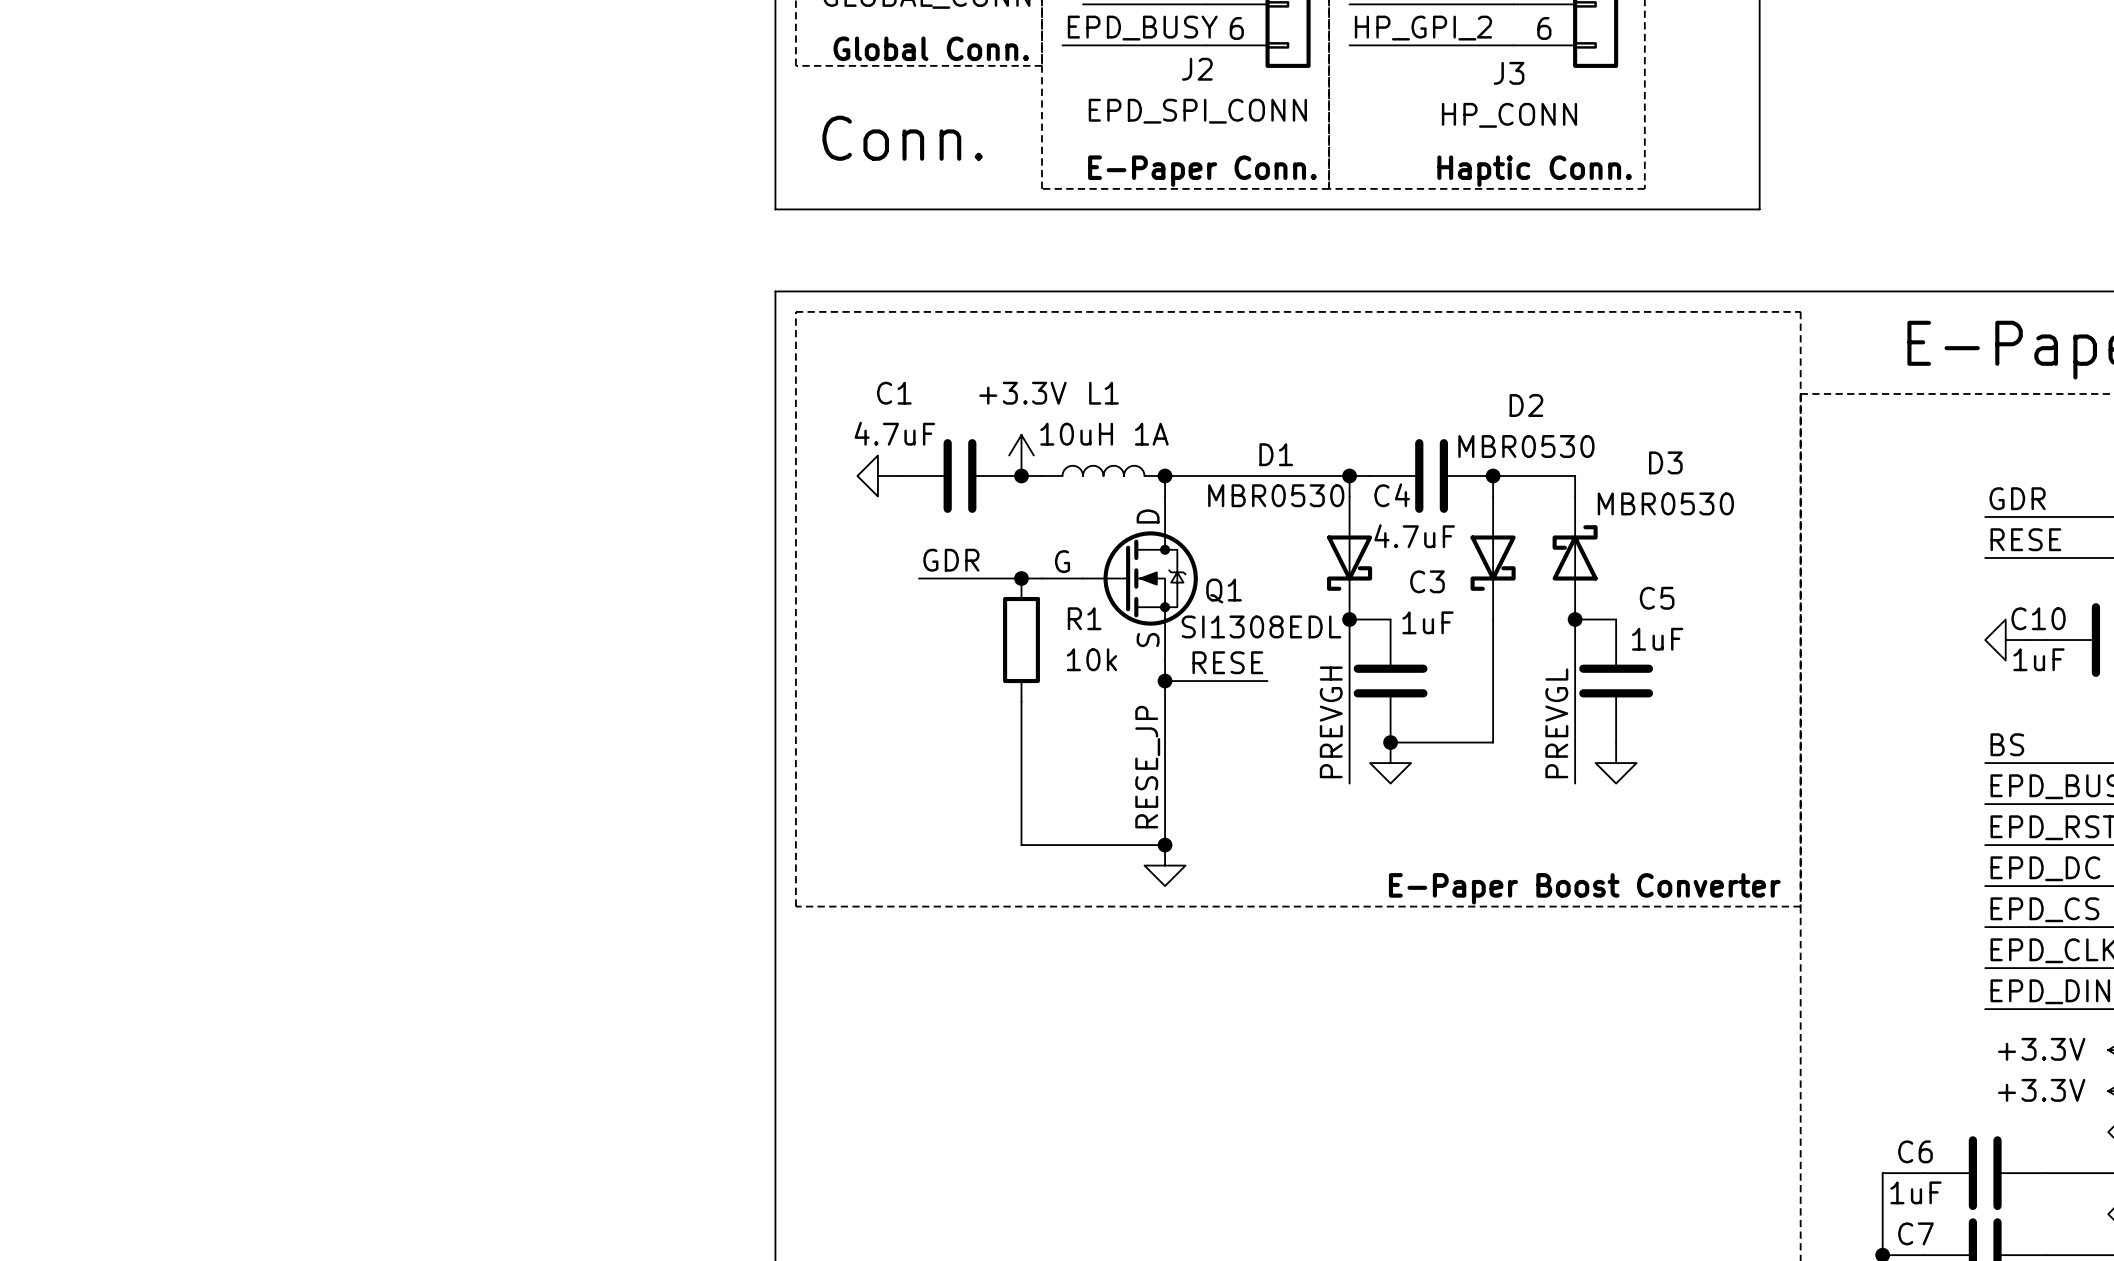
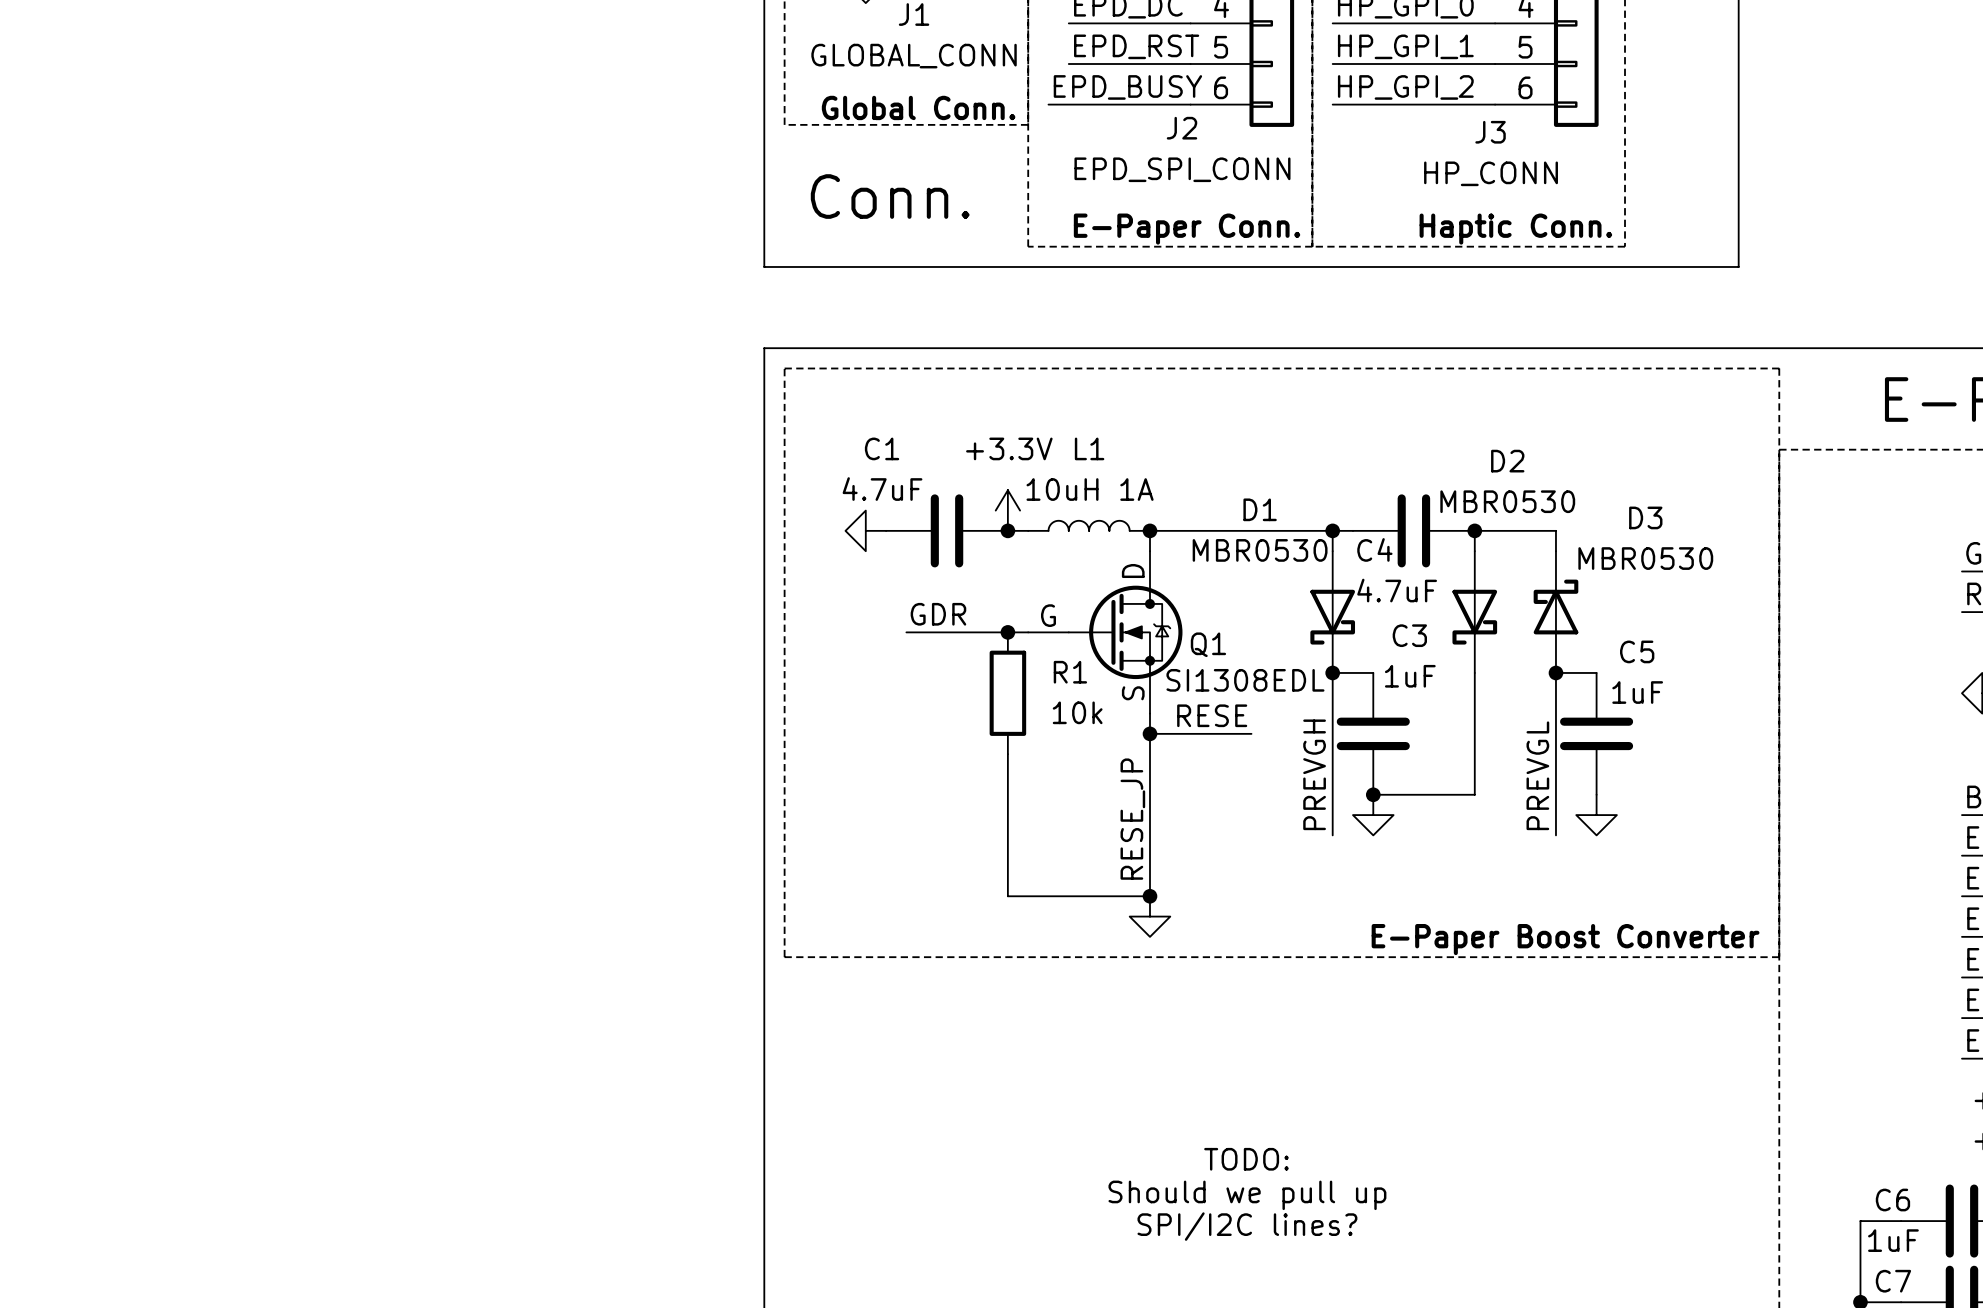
text: none -> TODO: (1246, 1159)
text: none -> Should we pull up (1247, 1195)
text: none -> SPI/I2C lines? (1247, 1226)

